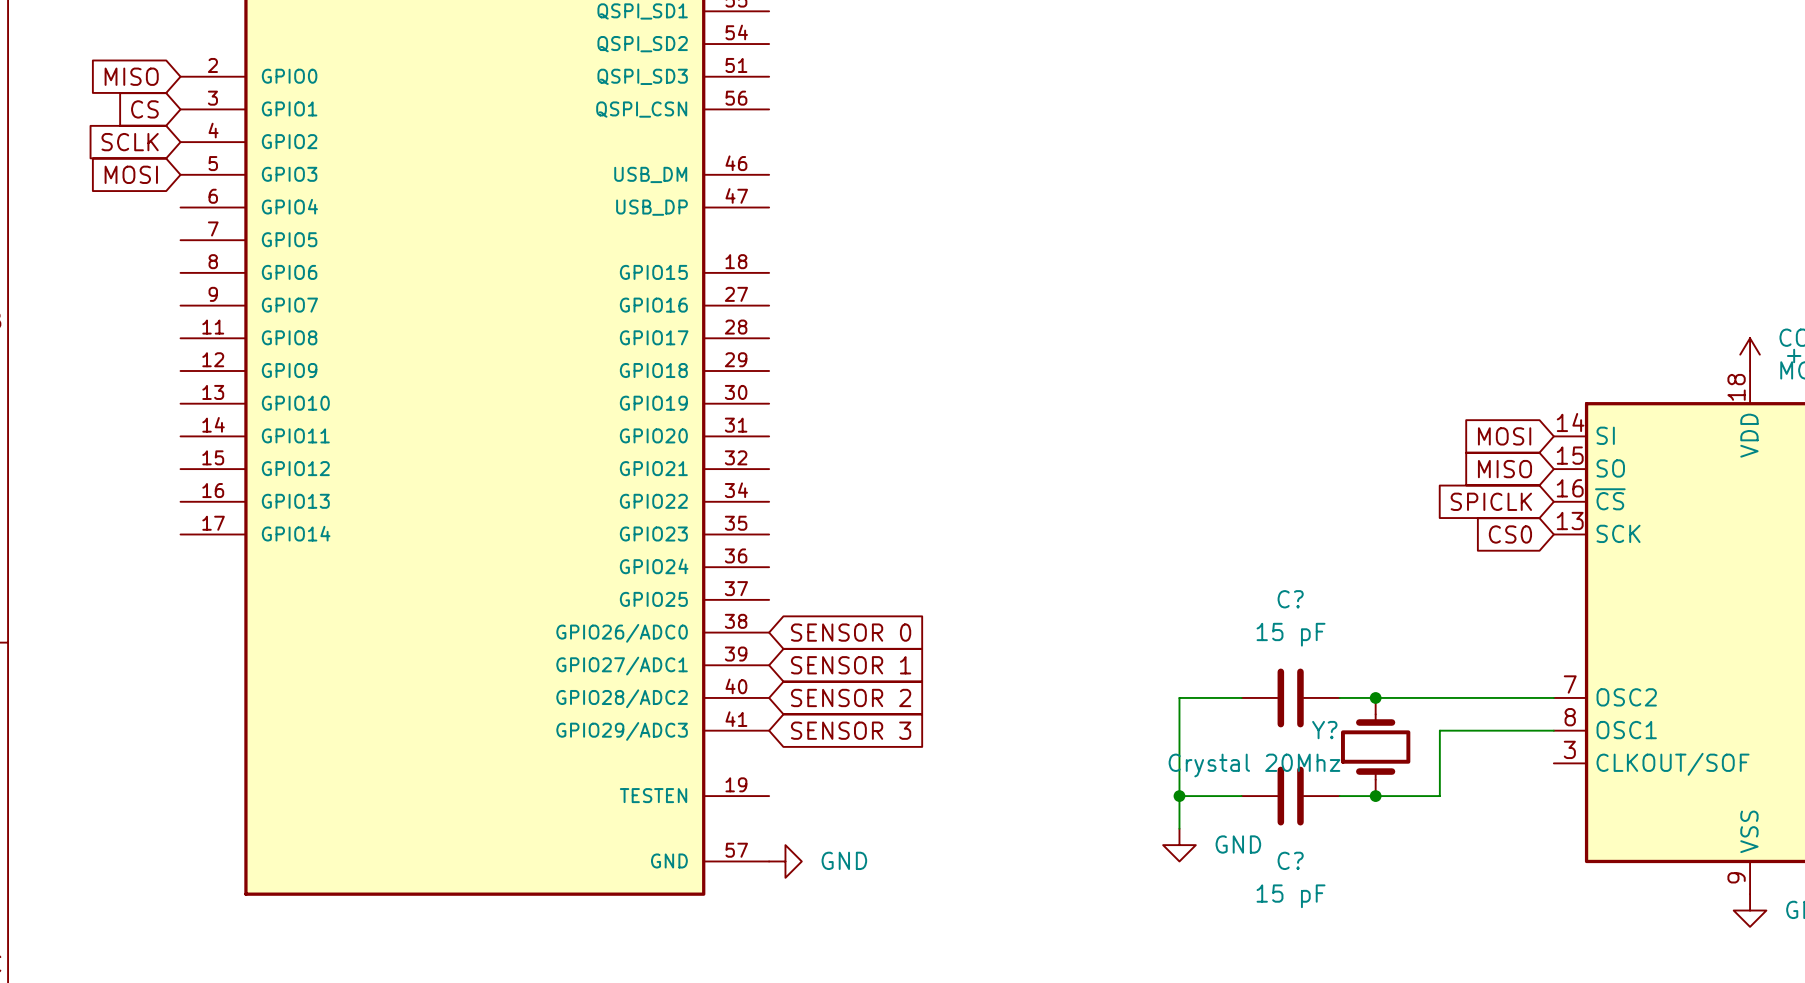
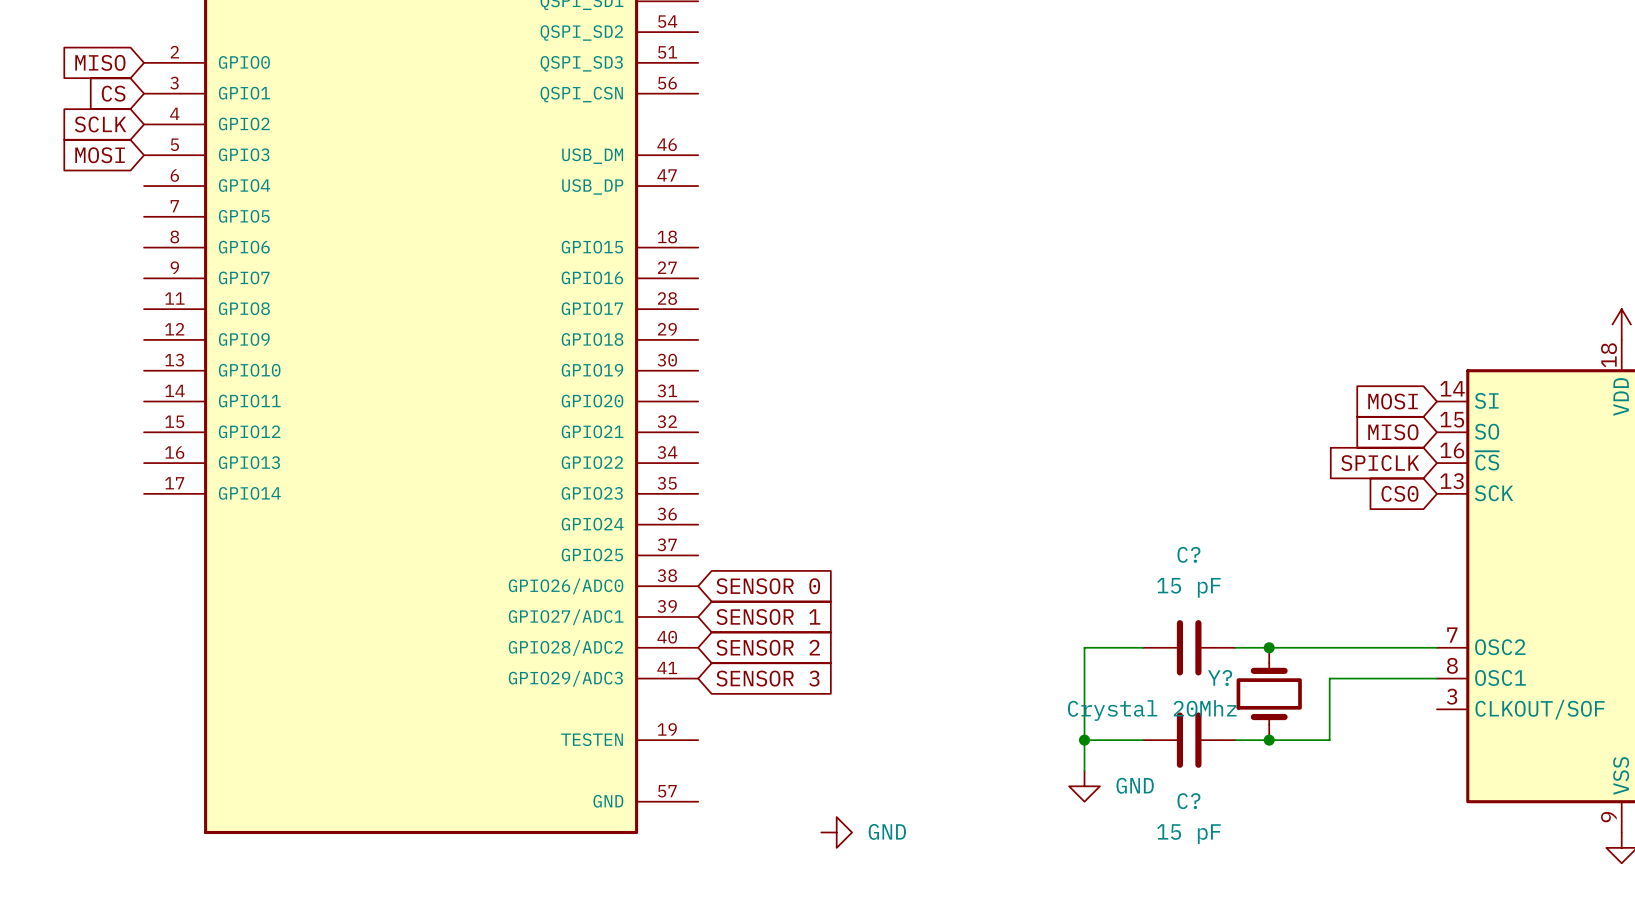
power symbol position: GND (785, 861) -> GND (836, 832)

